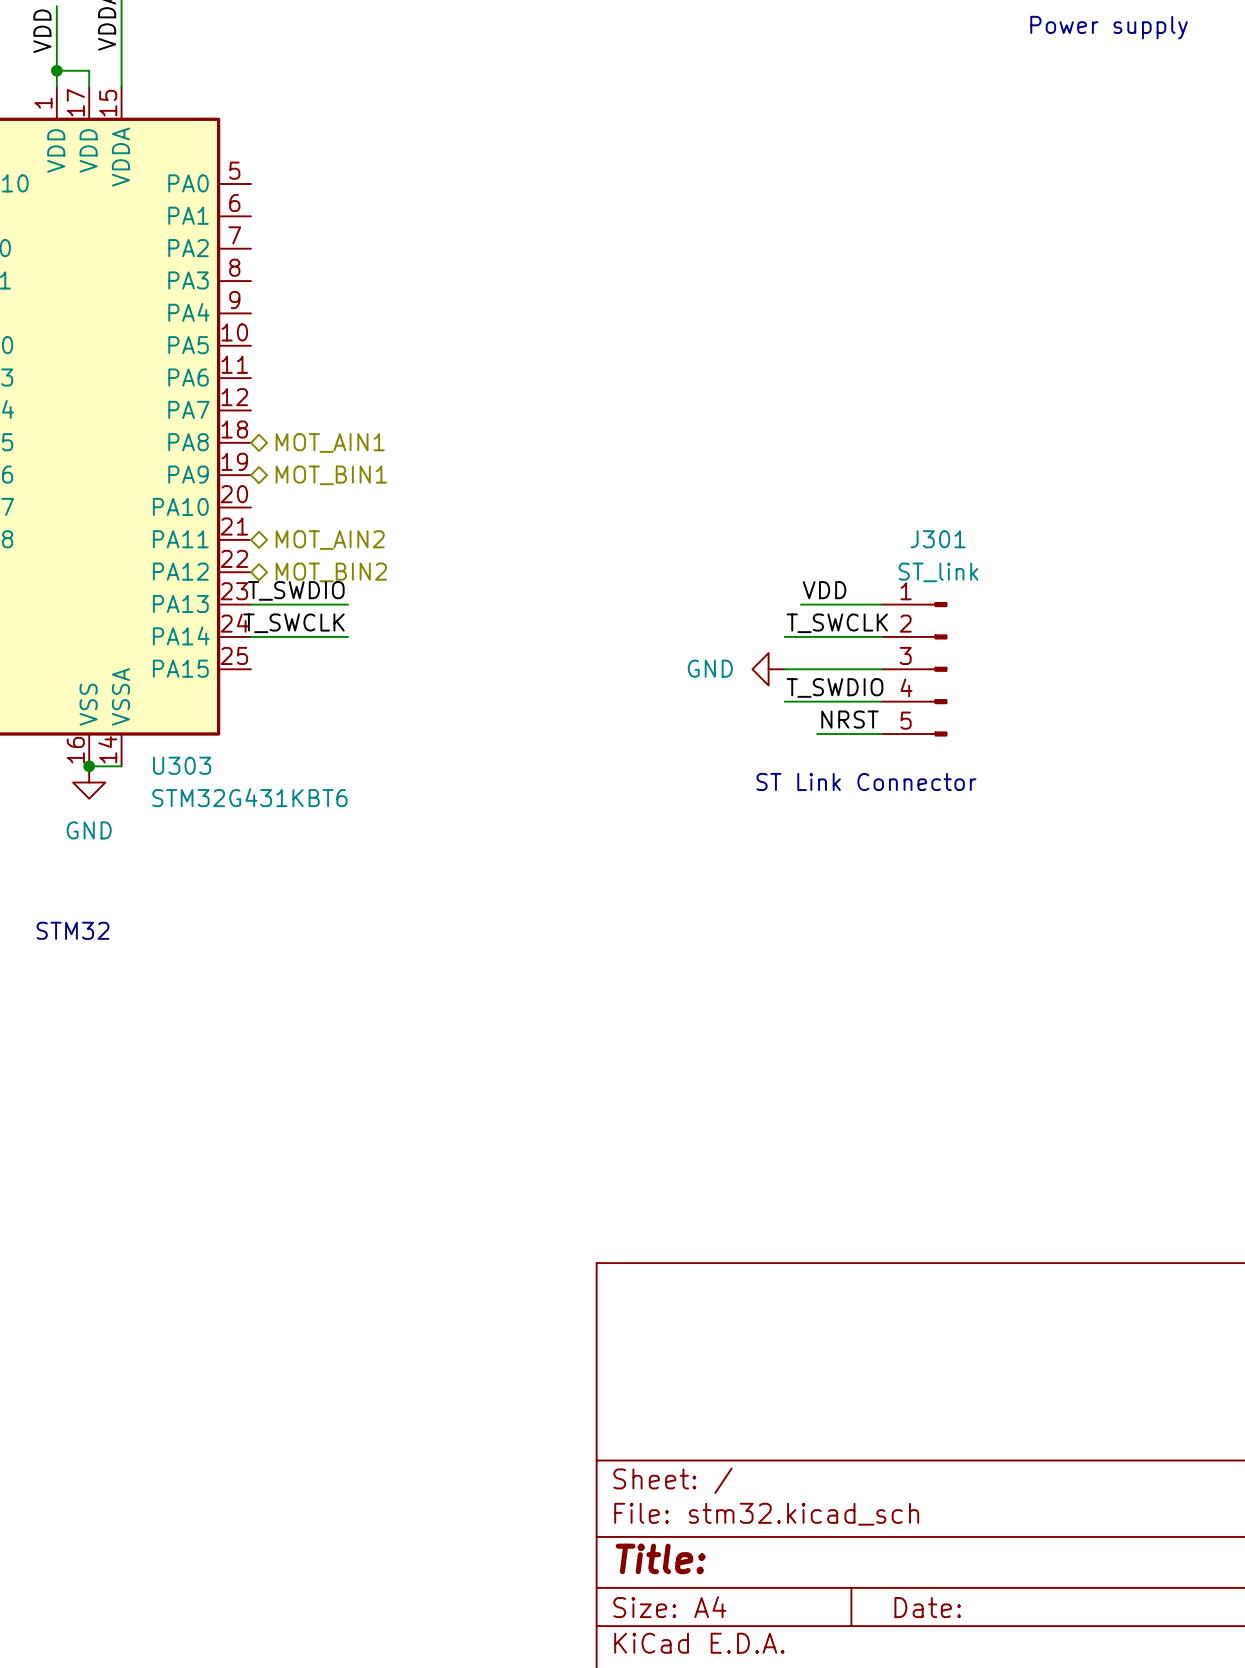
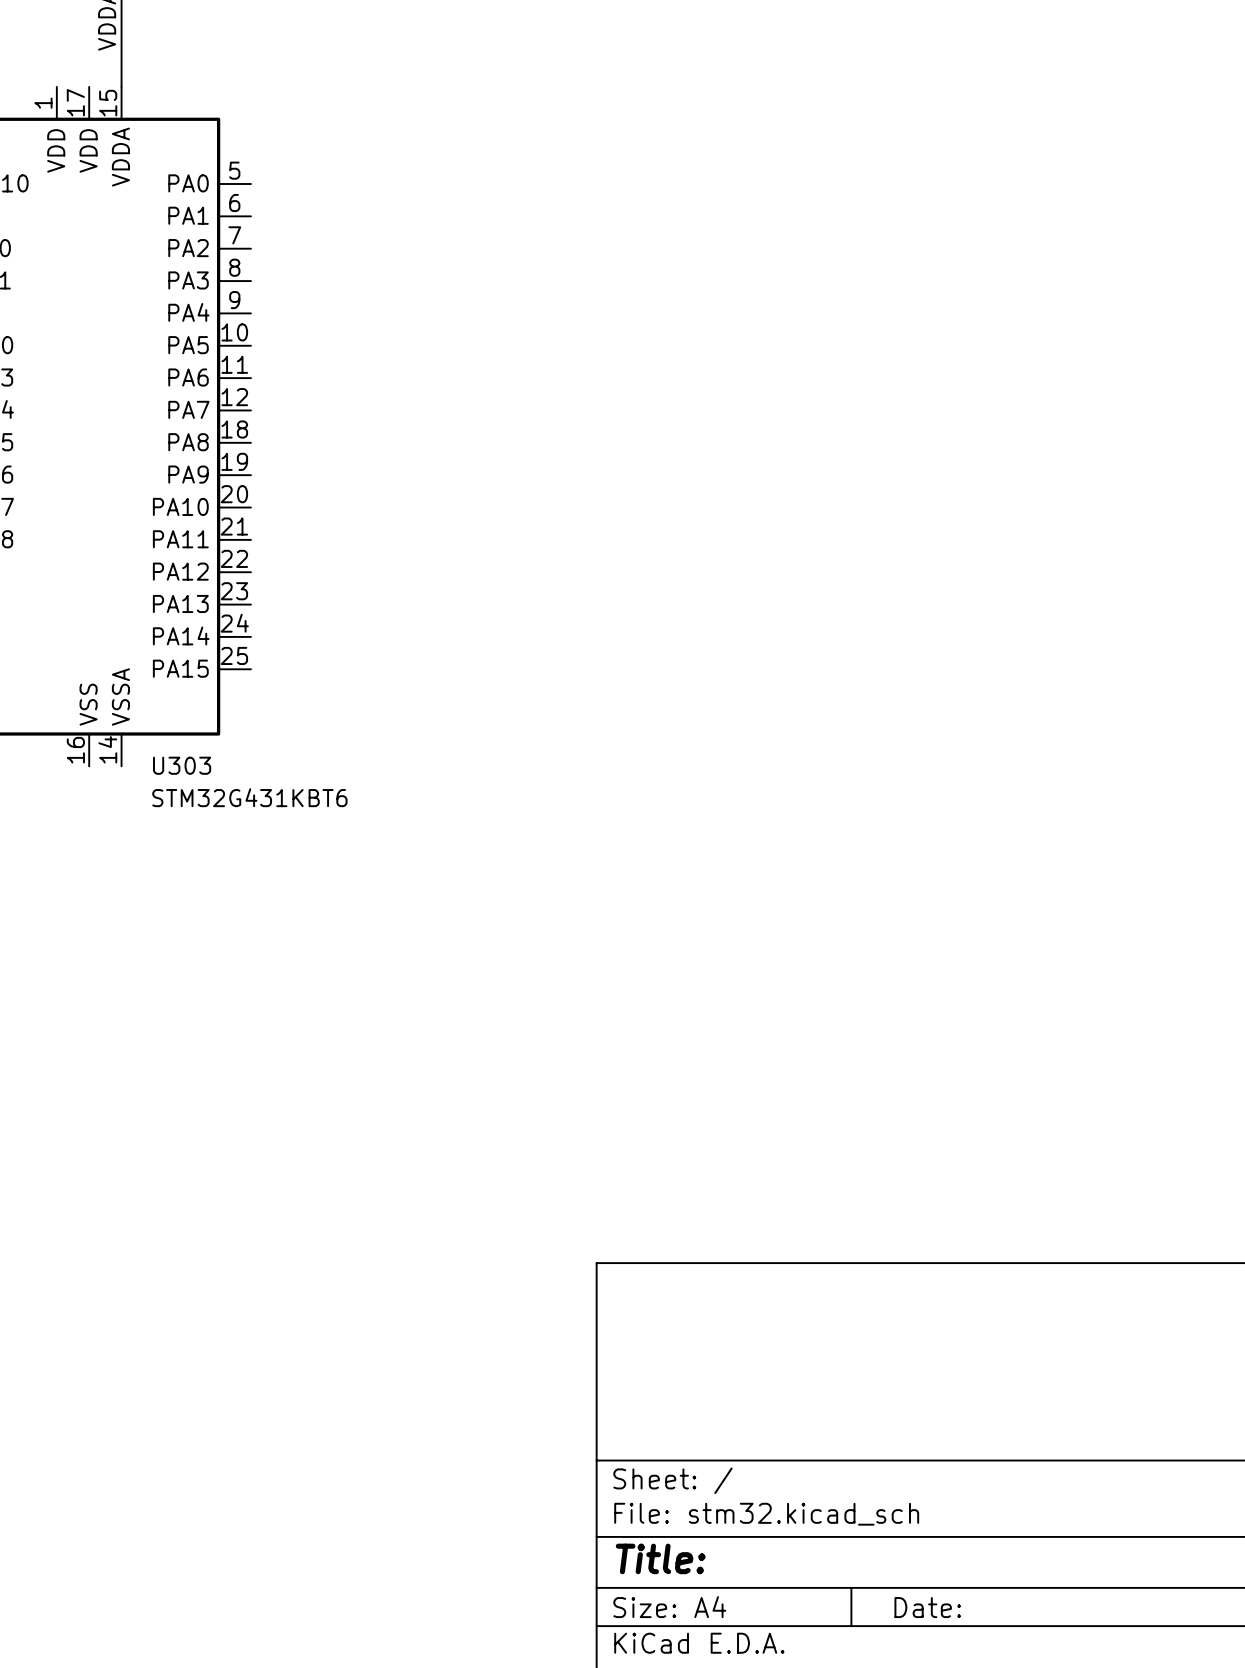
wire: (56, 6) (56, 86) -> none
text: Power supply (1109, 27) -> none
label: VDD (42, 31) -> none
wire: (56, 70) (89, 70) (89, 86) -> none
junction: (56, 70) -> none
hierarchical label: MOT_AIN1 (330, 442) -> none
hierarchical label: MOT_BIN1 (331, 475) -> none
hierarchical label: MOT_AIN2 (330, 540) -> none
hierarchical label: MOT_BIN2 (331, 572) -> none
label: T_SWDIO (296, 590) -> none
label: VDD (824, 590) -> none
wire: (250, 604) (348, 604) -> none
wire: (800, 604) (881, 604) -> none
label: T_SWCLK (293, 623) -> none
label: T_SWCLK (837, 623) -> none
wire: (250, 636) (348, 636) -> none
wire: (784, 636) (881, 636) -> none
power symbol: GND (768, 669) -> none
wire: (784, 669) (881, 669) -> none
J301: ST_link (914, 669) -> none
label: T_SWDIO (834, 687) -> none
wire: (784, 701) (881, 701) -> none
label: NRST (849, 719) -> none
wire: (817, 733) (881, 733) -> none
wire: (89, 766) (121, 766) -> none
junction: (89, 766) -> none
text: ST Link Connector (866, 781) -> none
power symbol: GND (89, 782) -> none
text: STM32 (73, 930) -> none

